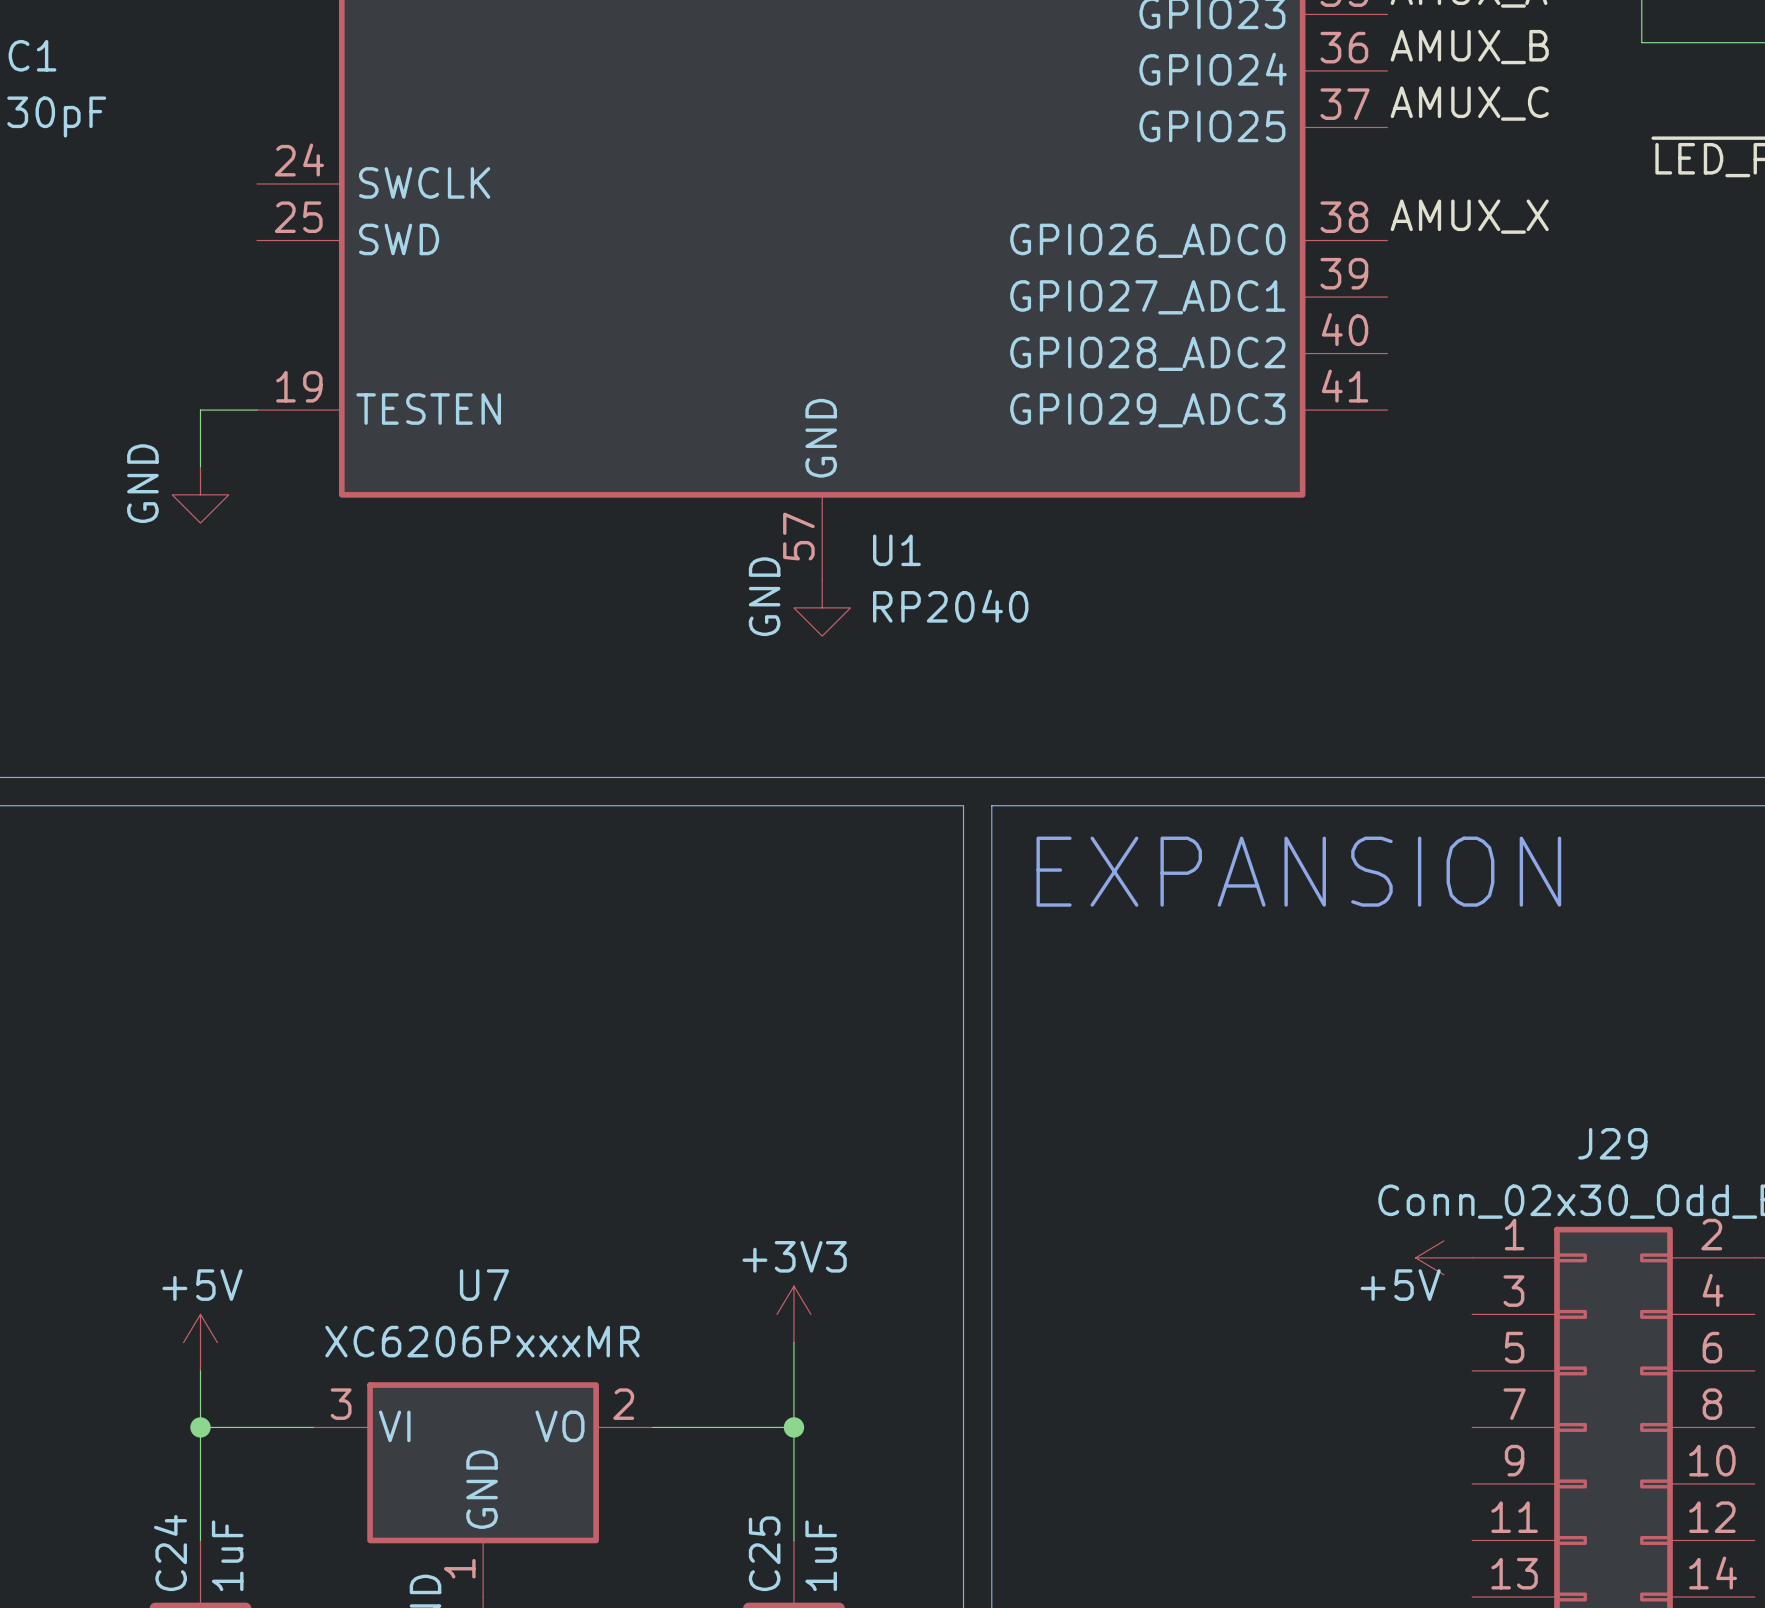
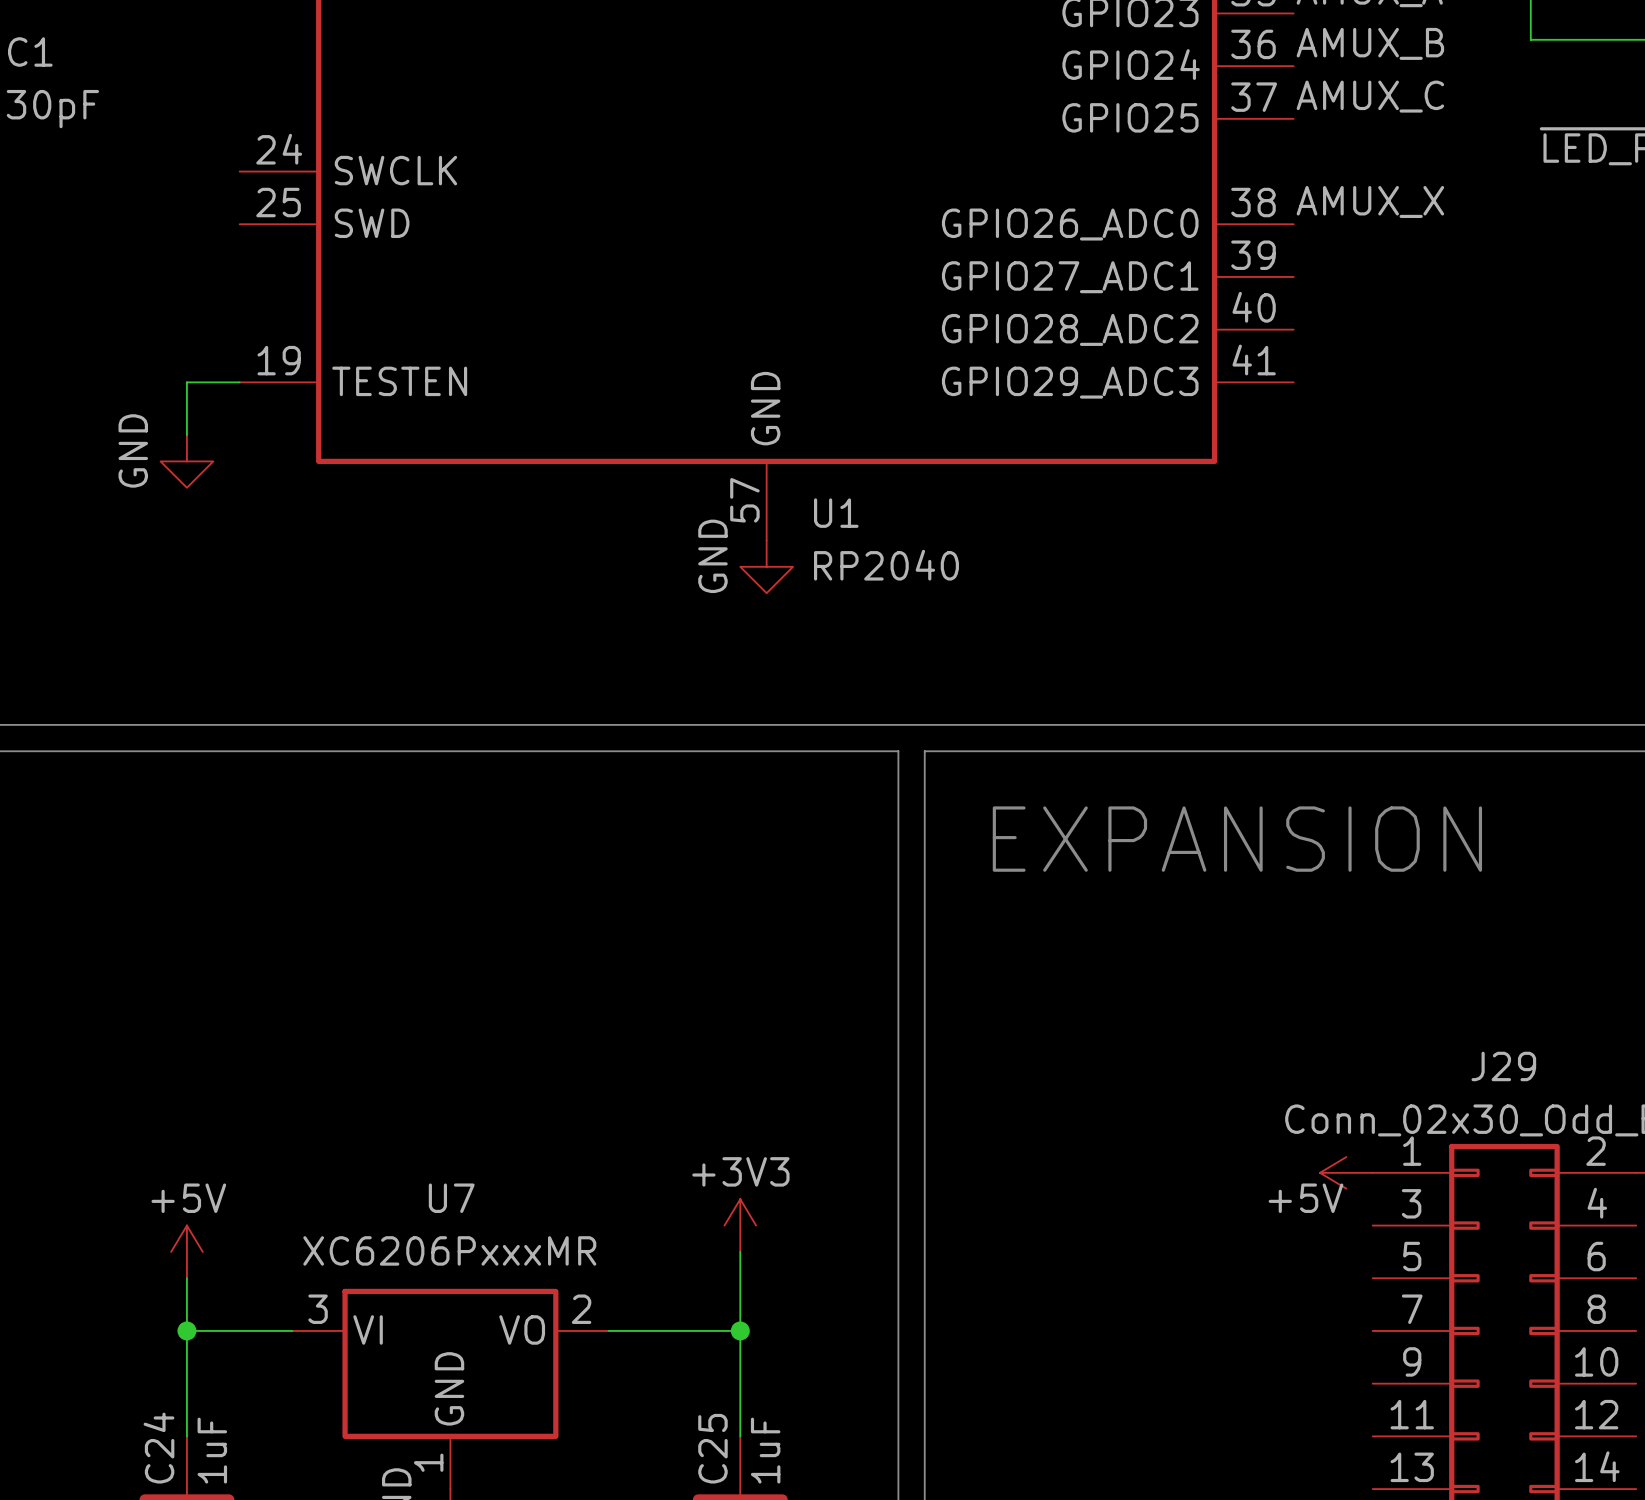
text position: EXPANSION (1298, 871) -> EXPANSION (1237, 839)

